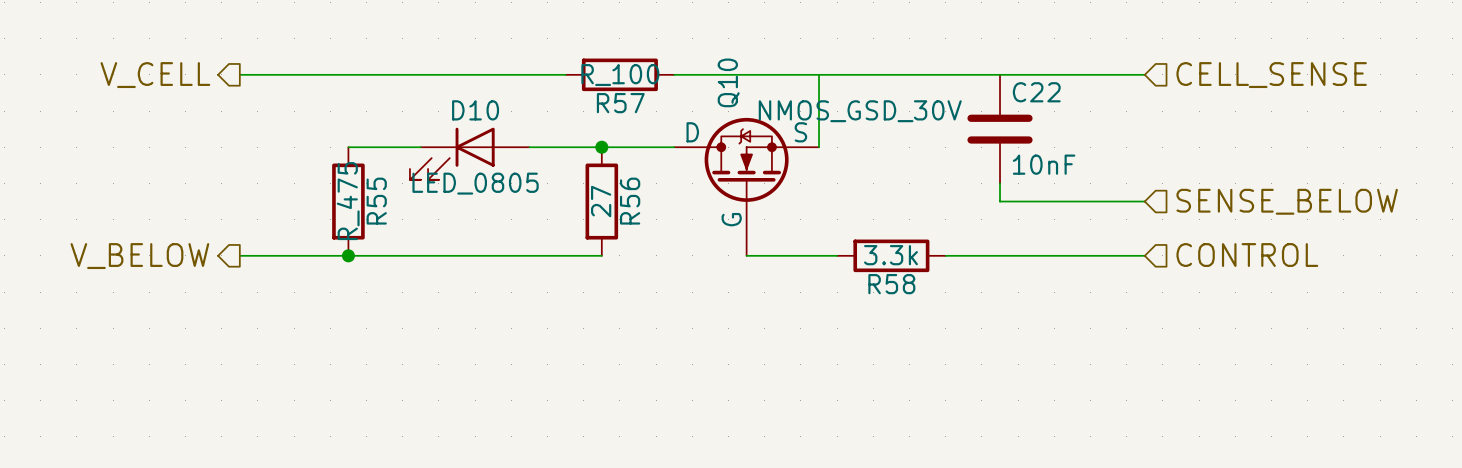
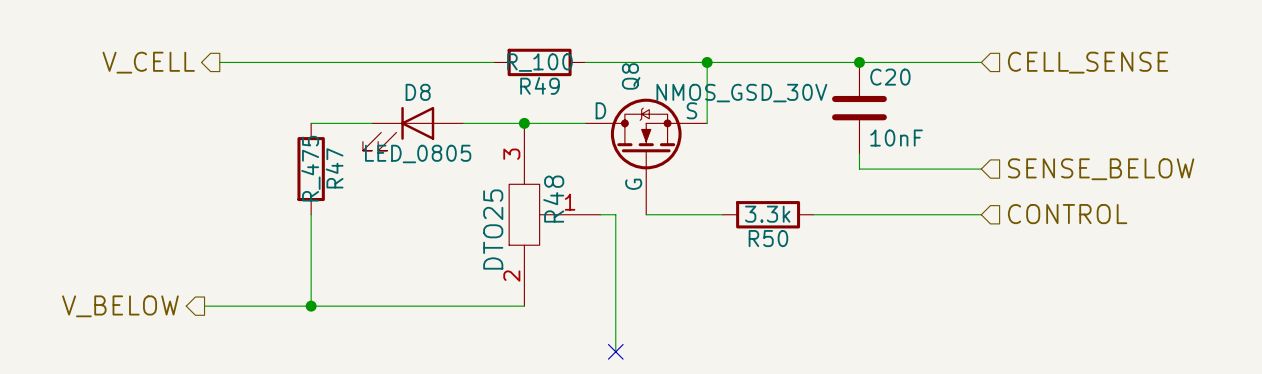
junction: none -> (707, 62)
junction: none -> (859, 62)
Q10 name: Q10 (728, 82) -> Q8 (631, 76)
C22 name: C22 (1036, 92) -> C20 (890, 77)
R57 name: R57 (620, 103) -> R49 (539, 85)
D10 name: D10 (475, 110) -> D8 (418, 92)
R55 name: R55 (376, 201) -> R47 (334, 168)
R56: 27 (601, 201) -> none
wire: (239, 255) (601, 255) -> none
wire: none -> (311, 214) (311, 306)
junction: (348, 255) -> none
R48: none -> DTO25 (554, 214)
wire: none -> (600, 214) (615, 214) (615, 351)
hierarchical label position: V_BELOW (139, 256) -> V_BELOW (120, 306)
R58 name: R58 (891, 284) -> R50 (768, 238)
wire: none -> (204, 306) (524, 306)
junction: none -> (311, 306)
no-connect mark: none -> (615, 351)

